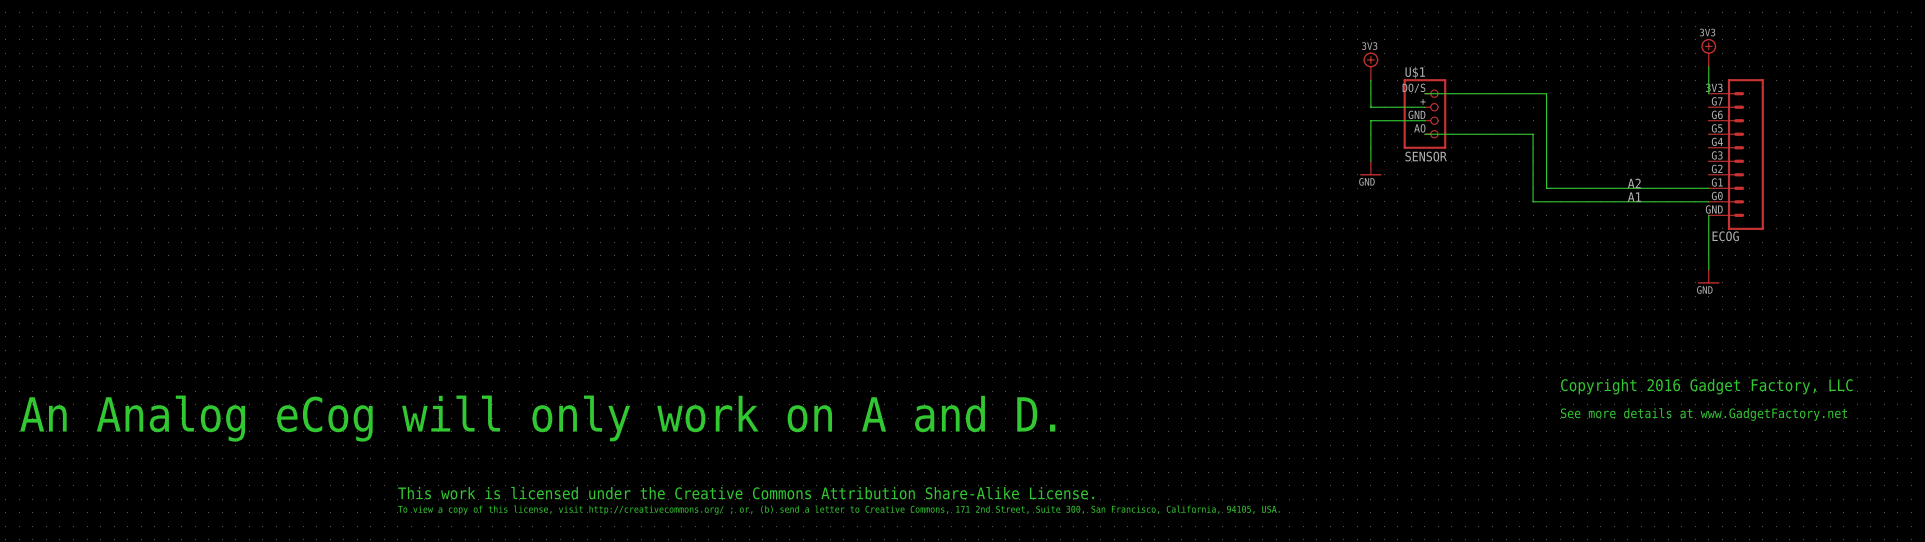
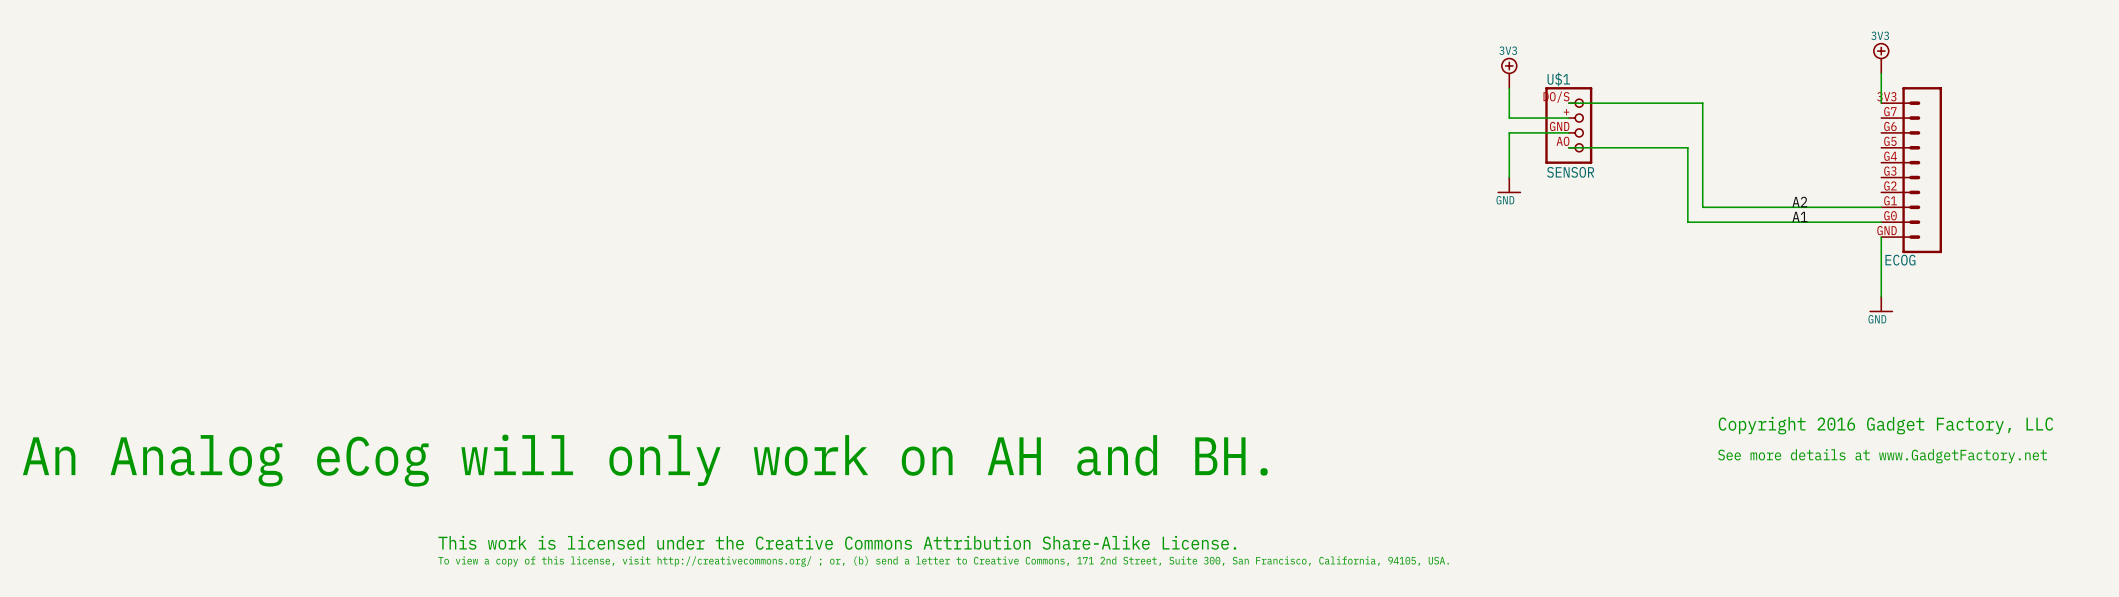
text: An Analog eCog will only work on A and D. (537, 418) -> An Analog eCog will only work on AH and BH. (645, 460)

